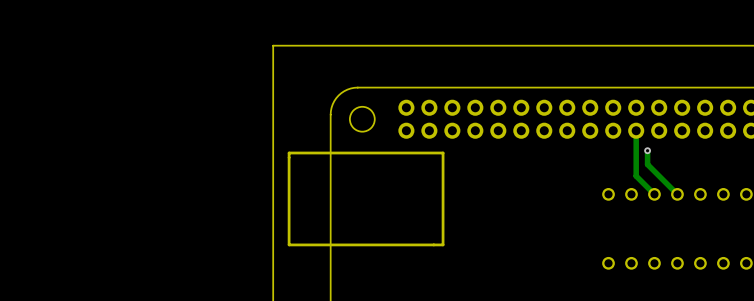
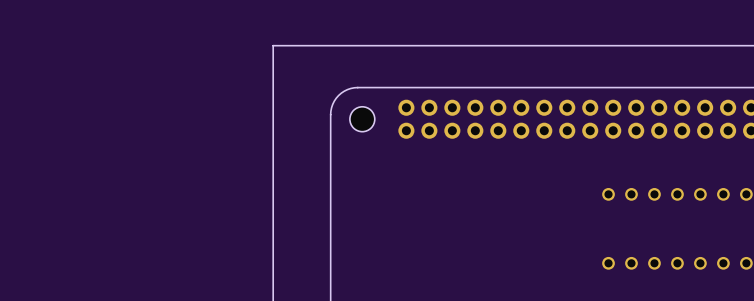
track: (636, 130) (636, 176) (654, 194) -> none
track: (647, 150) (647, 164) (677, 194) -> none
via: (647, 150) -> none
board edge: (443, 153) (289, 153) (289, 244) (443, 244) (443, 153) -> none

